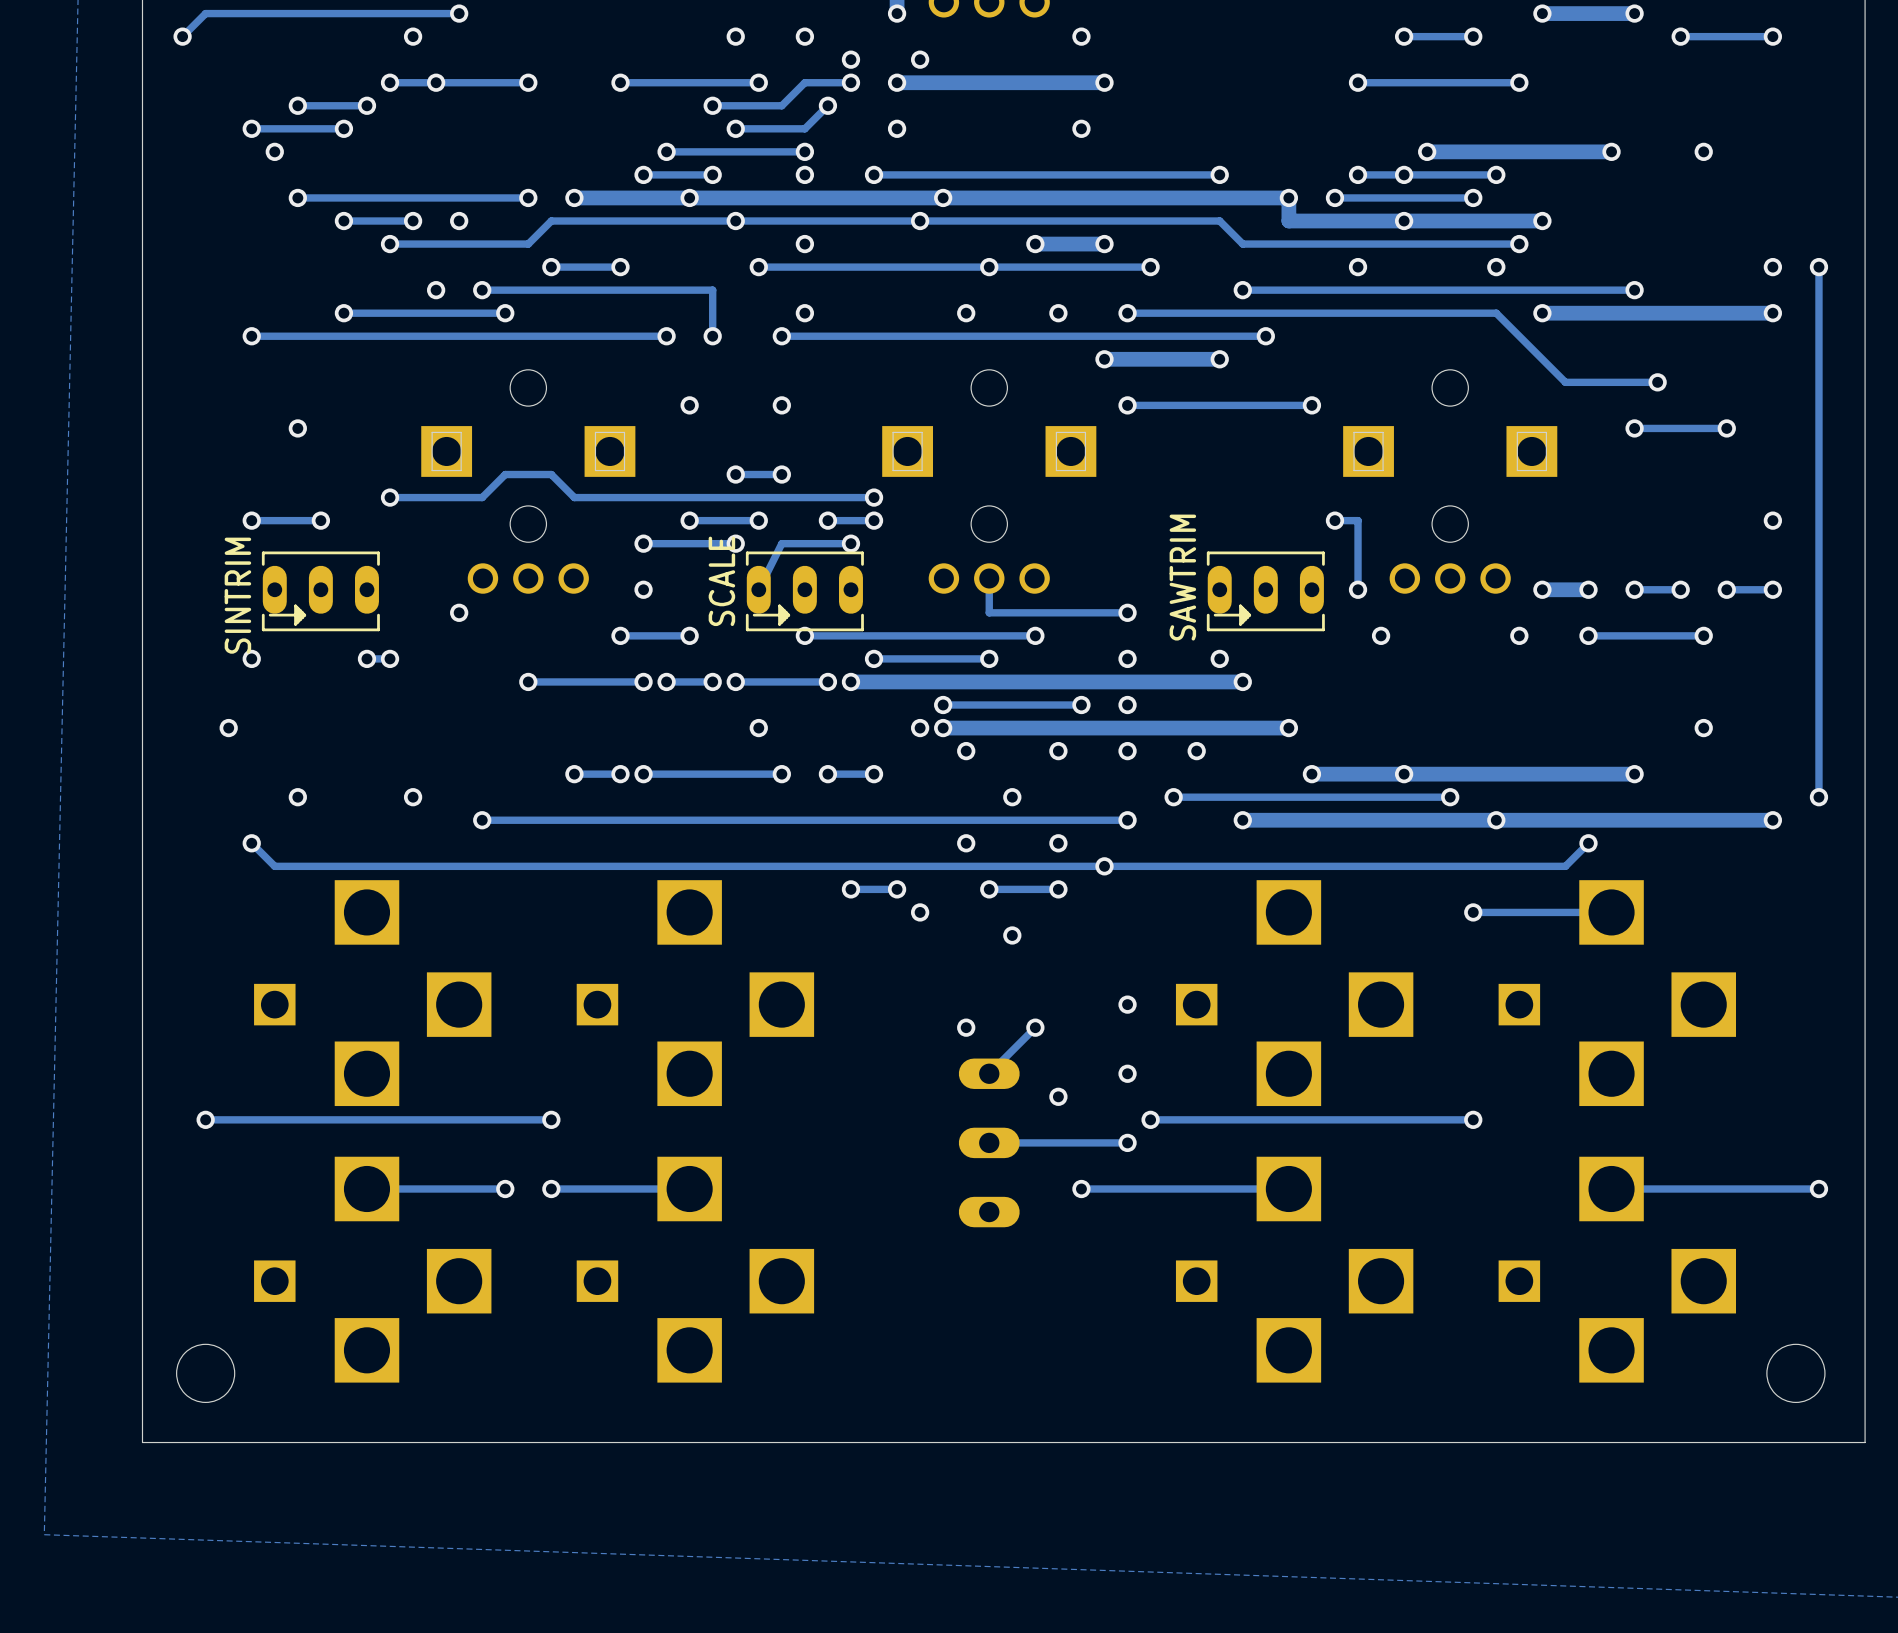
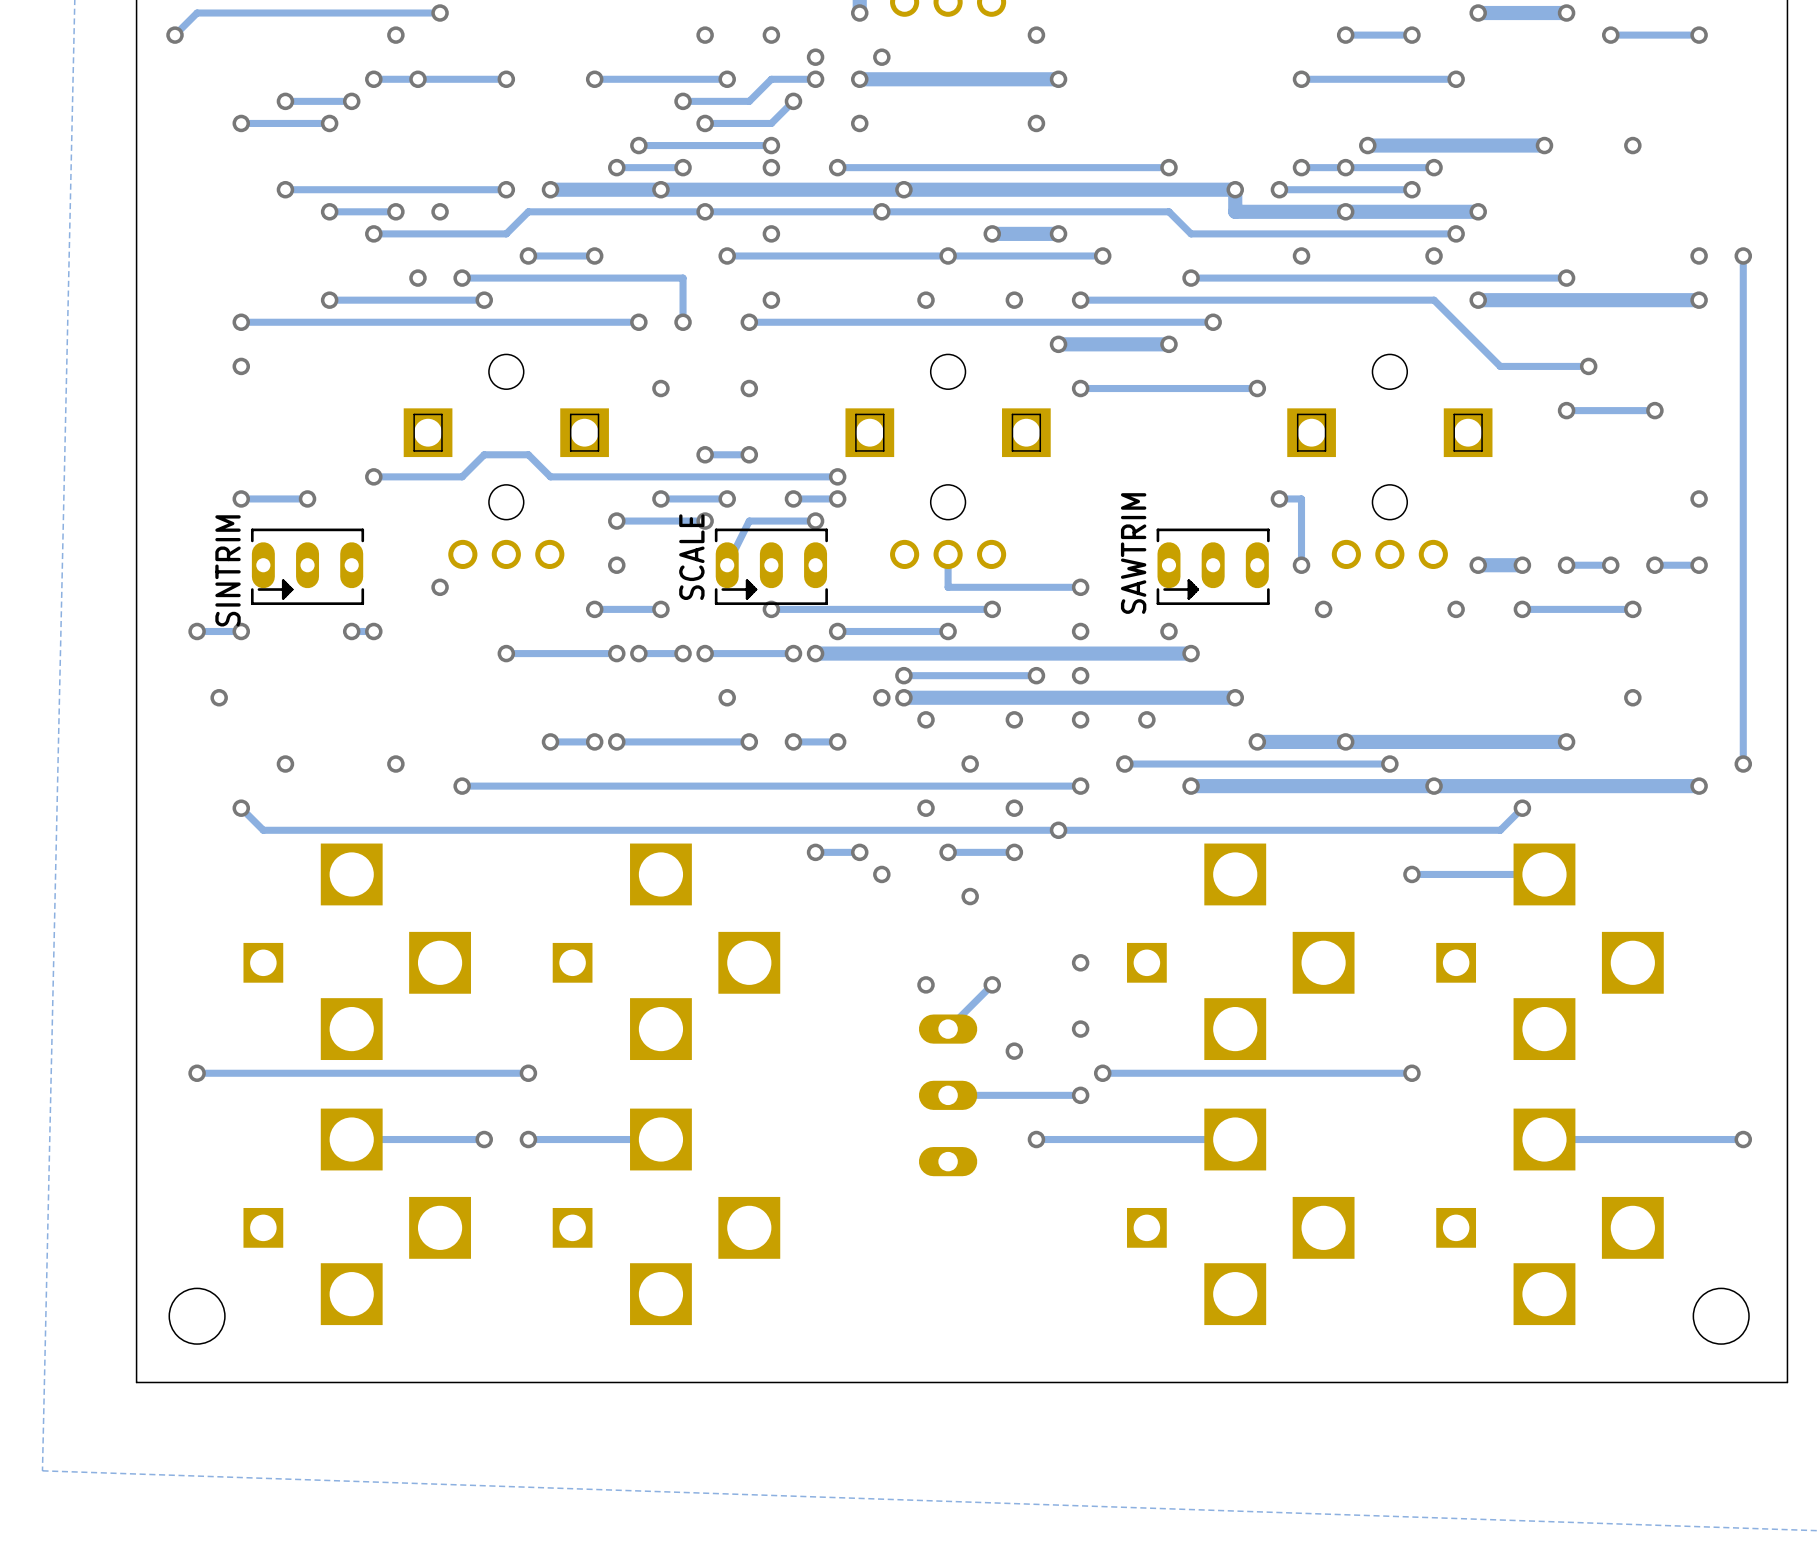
via: (274, 151) -> none
via position: (297, 428) -> (241, 366)
via: none -> (197, 631)
track: none -> (241, 631) (197, 631)

